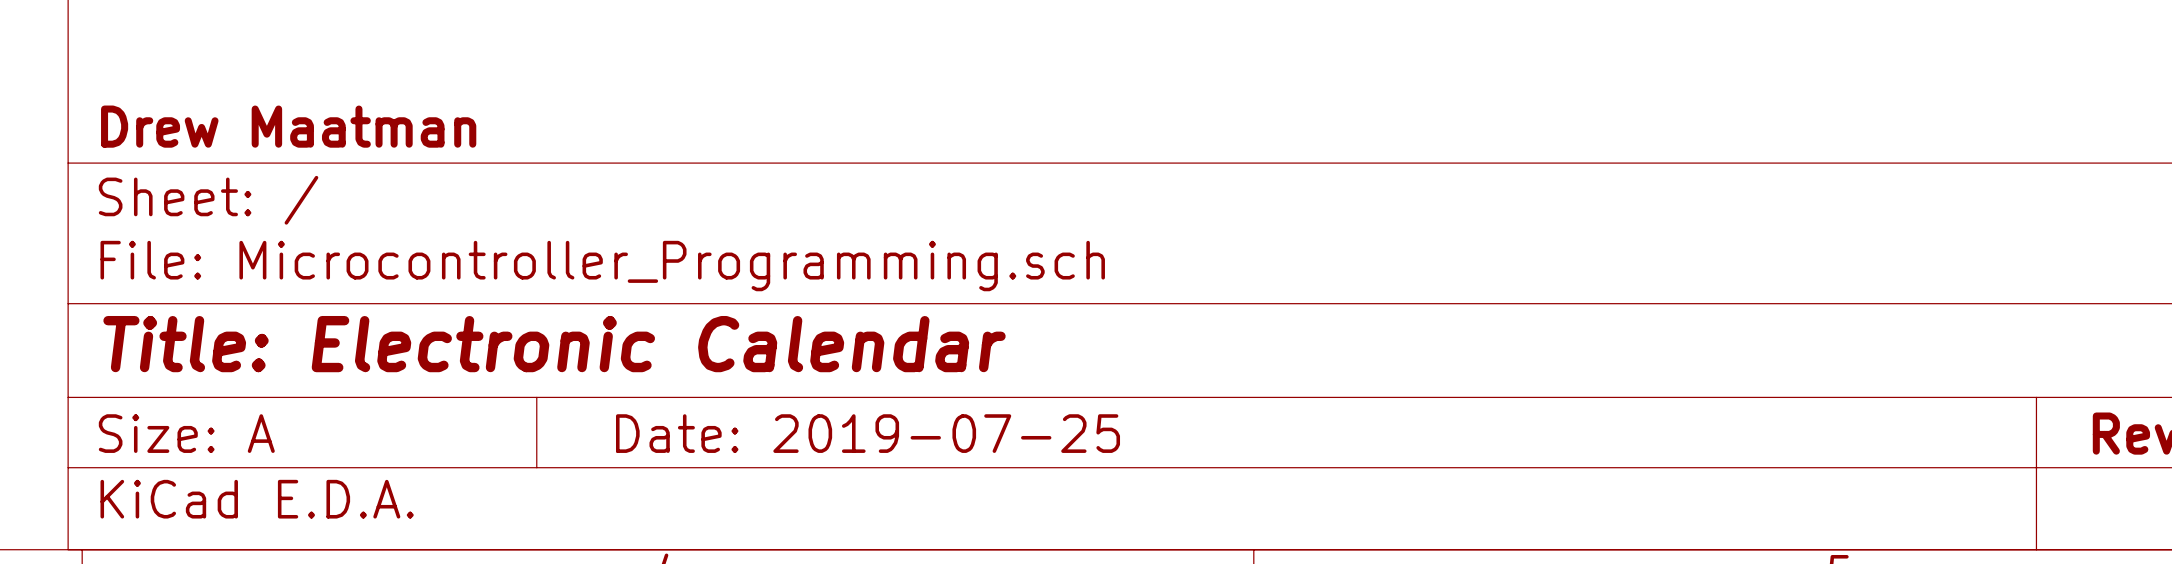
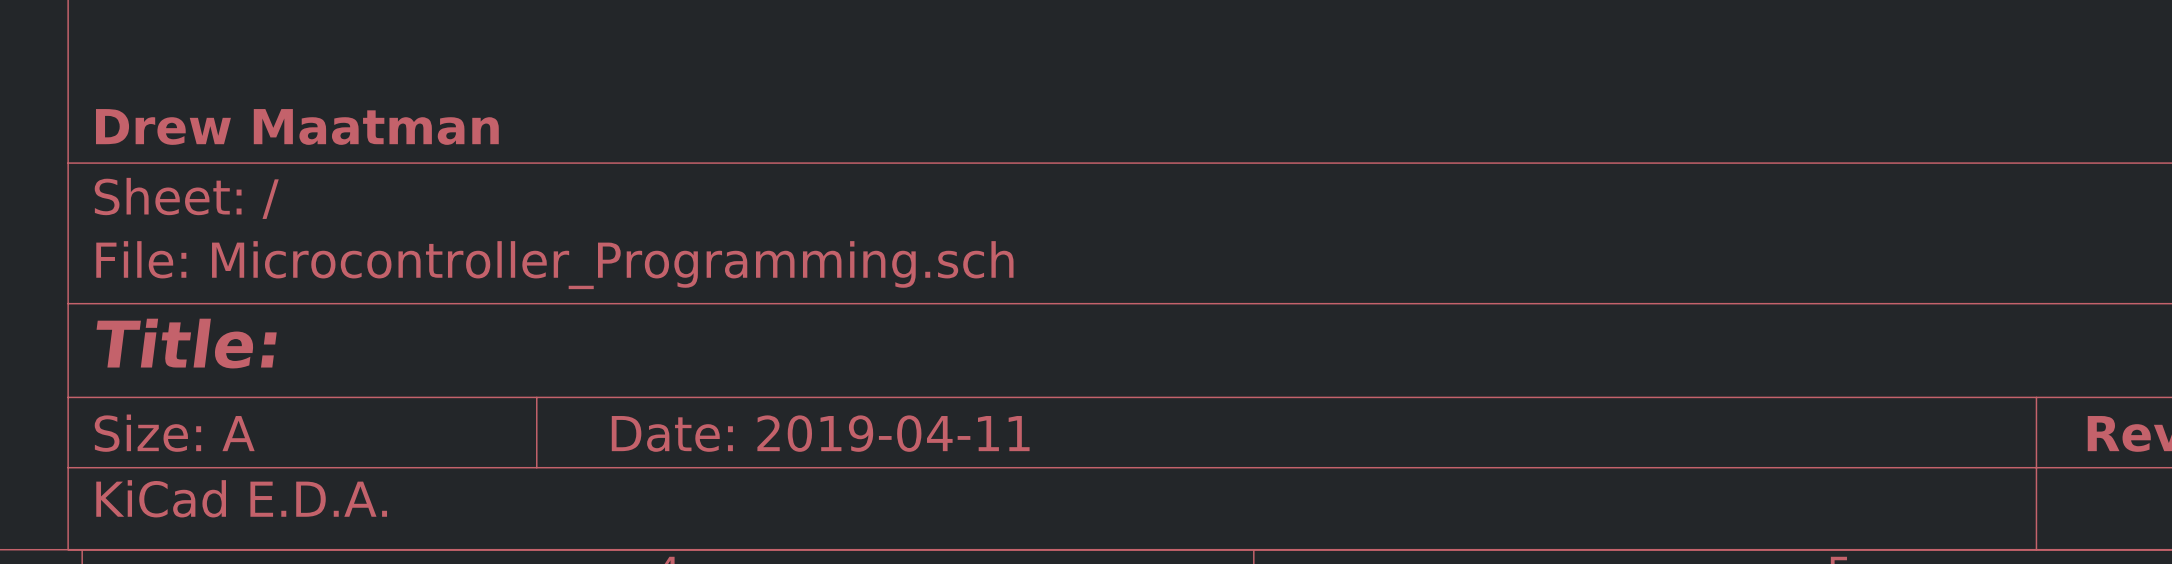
title block: Title: Electronic Calendar (554, 344) -> Title: (186, 343)
title block: Date: 2019-07-25 (868, 433) -> Date: 2019-04-11 (820, 433)

